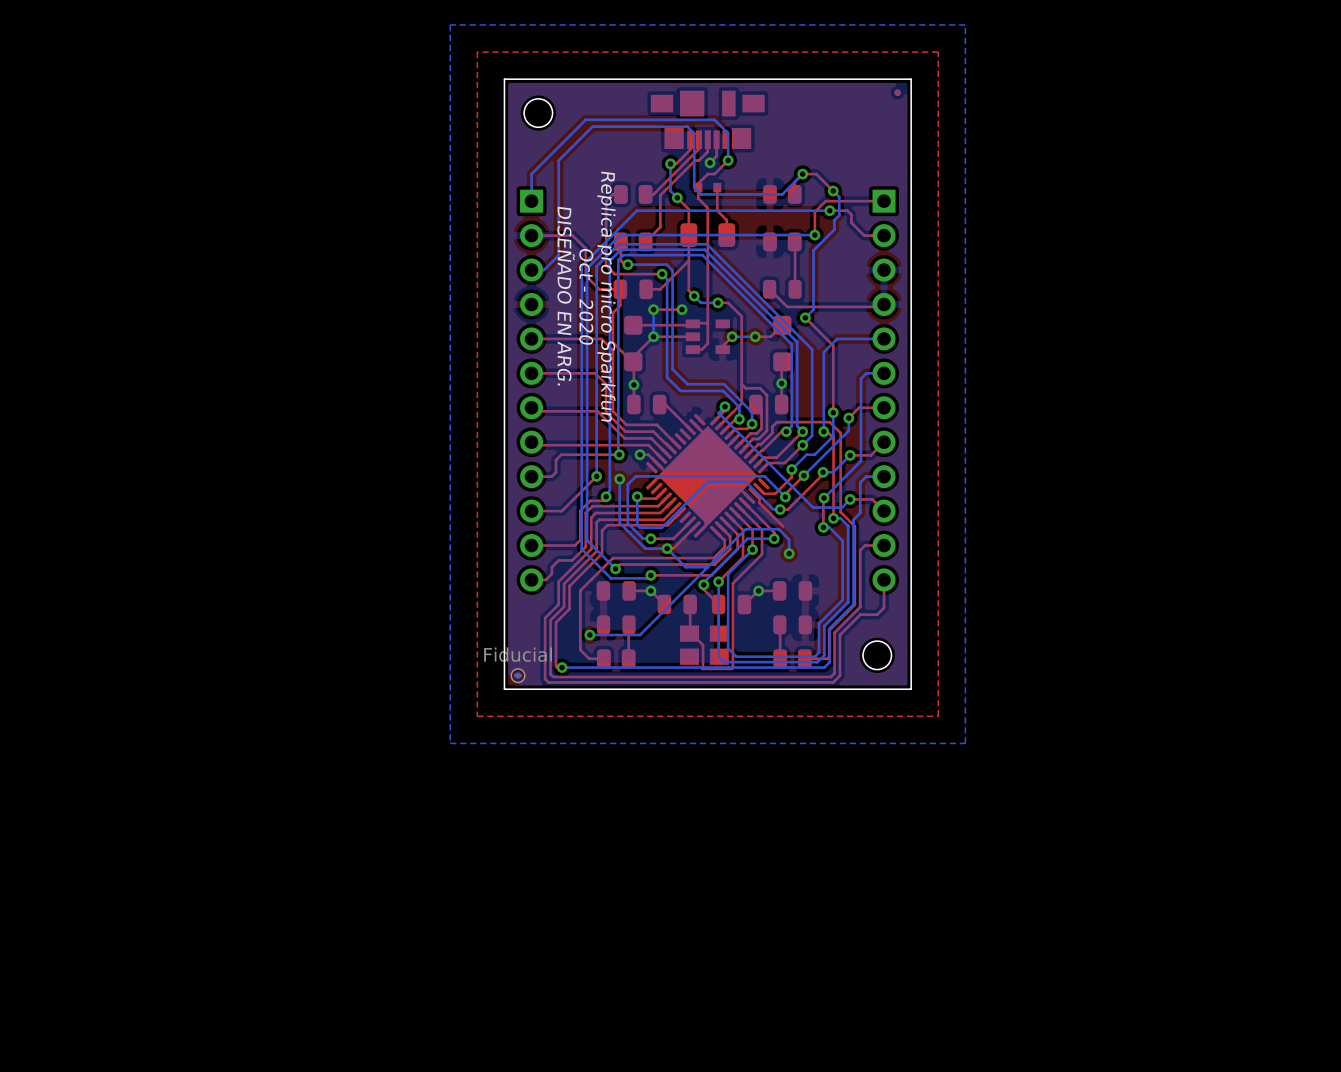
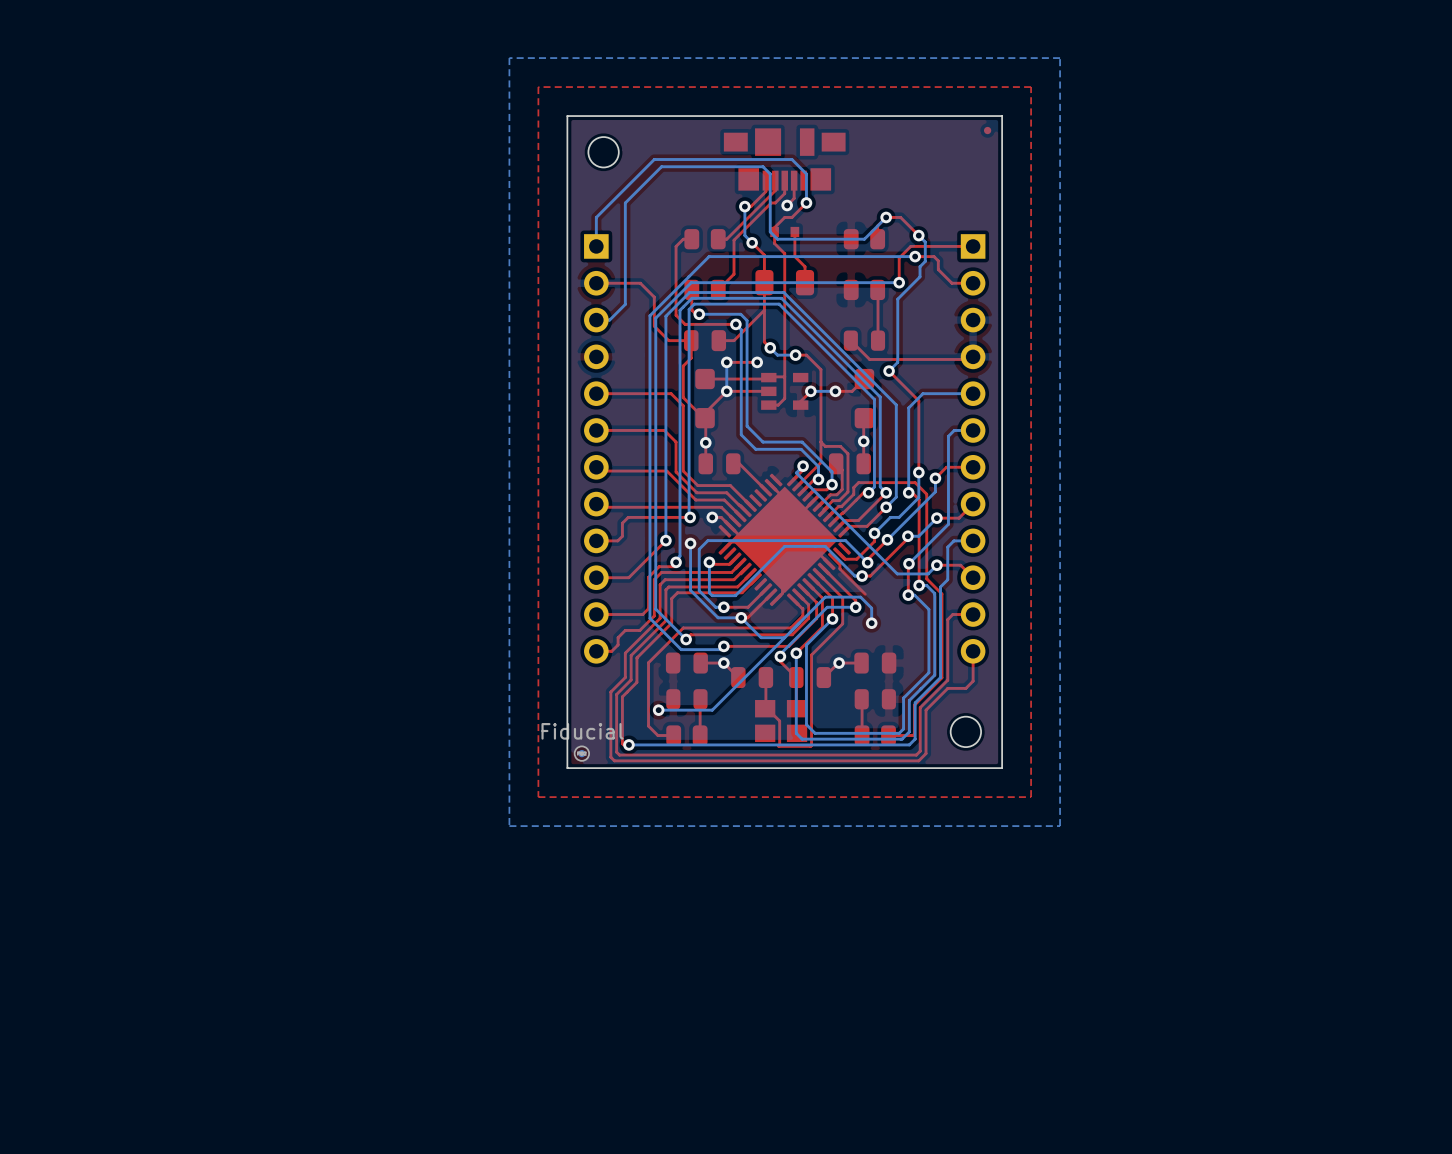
text: DISEÑADO EN ARG. (566, 296) -> none
text: Oct - 2020 (586, 296) -> none
text: Replica pro micro Sparkfun (606, 296) -> none

